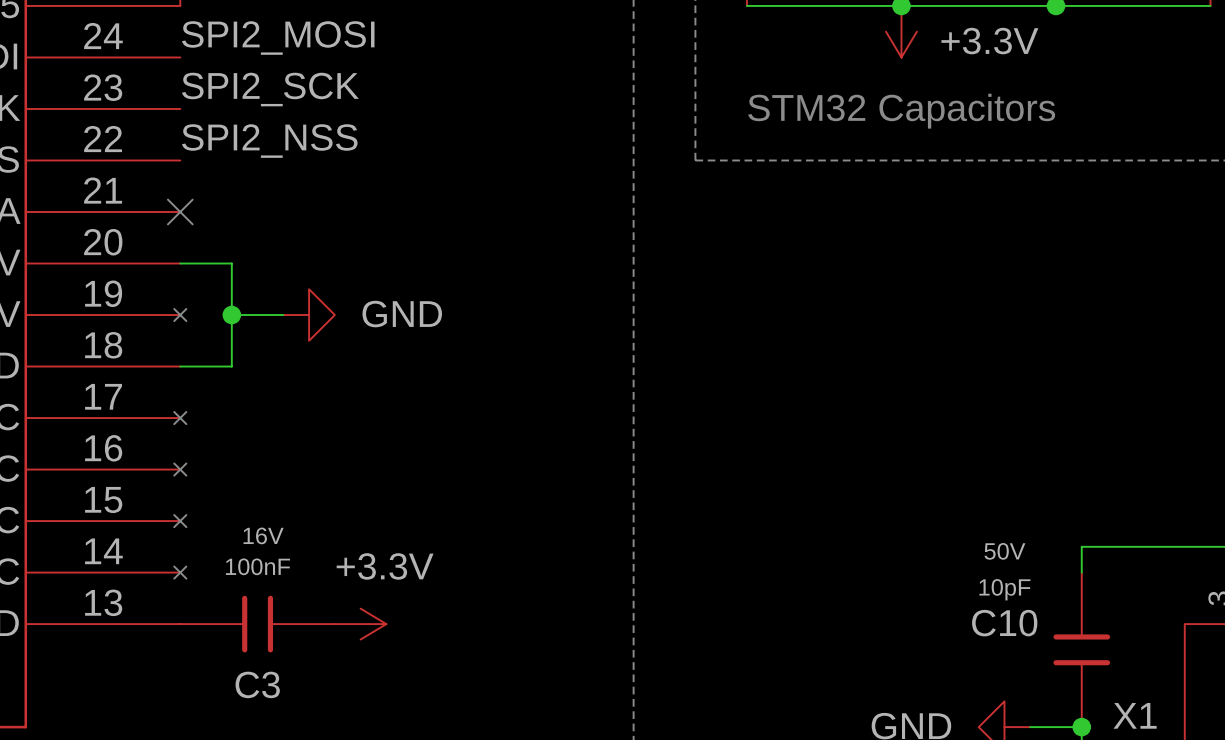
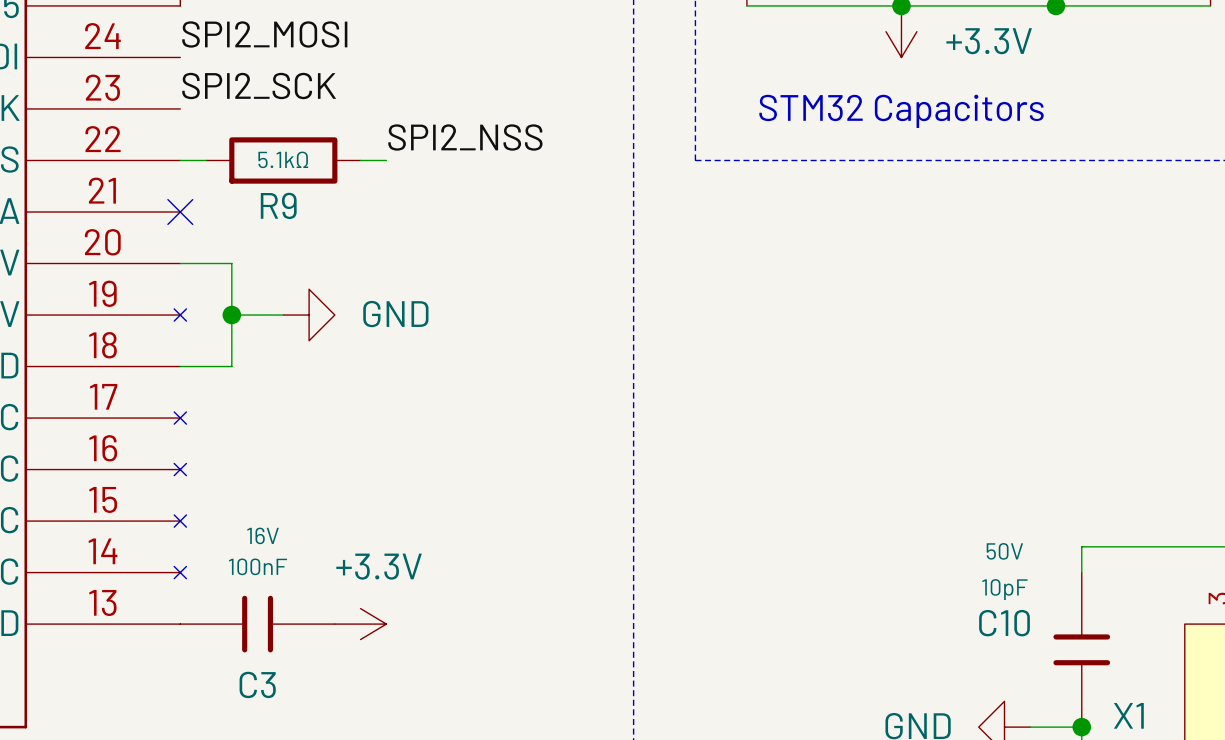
label position: SPI2_NSS (269, 141) -> SPI2_NSS (465, 137)
wire: none -> (180, 160) (206, 160)
R9: none -> 5.1kΩ (283, 160)
wire: none -> (360, 160) (386, 160)

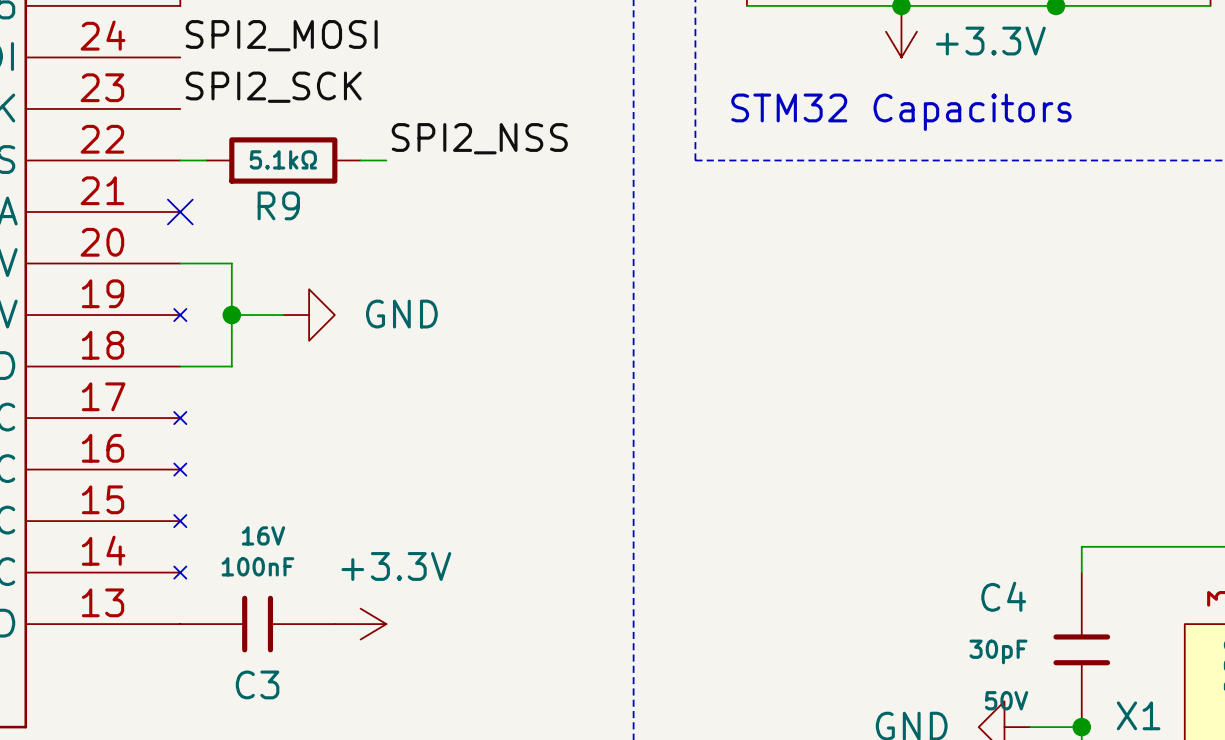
C10 text position: 50V (1004, 551) -> 50V (1006, 700)
C10 value: 10pF (1004, 589) -> 30pF (998, 651)
C10 name: C10 (1004, 623) -> C4 (1003, 596)

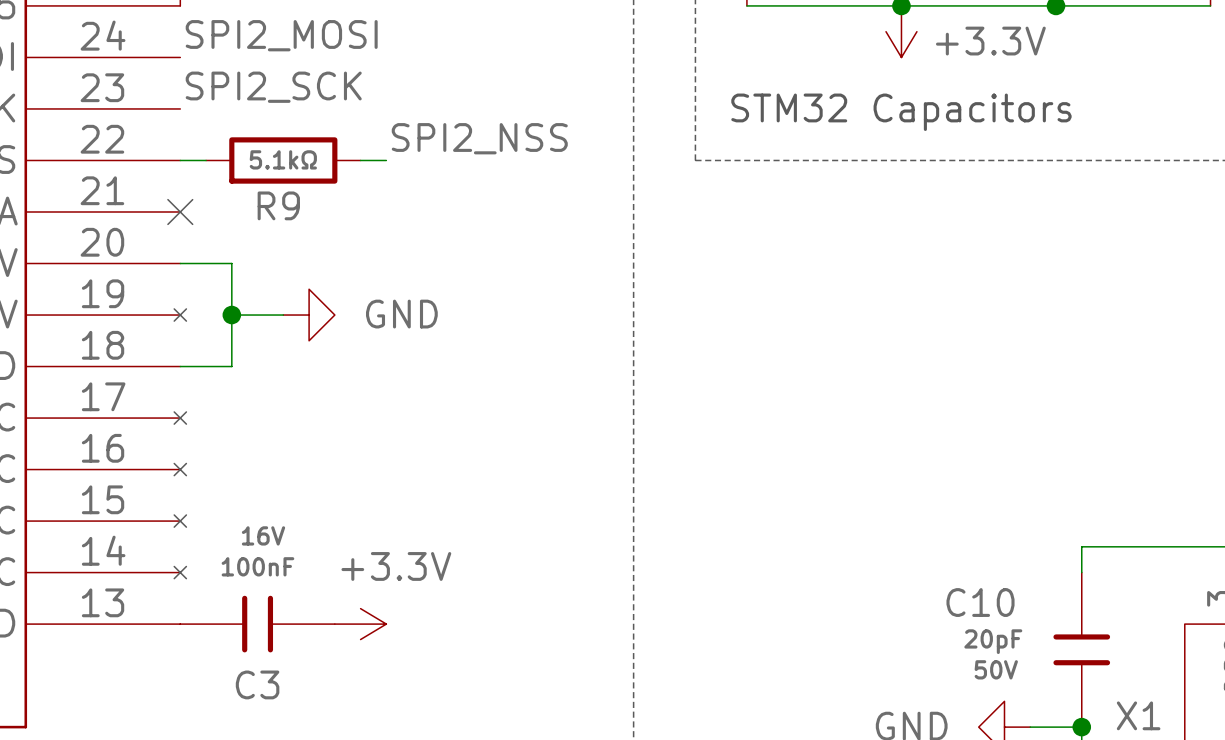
C4 name: C4 (1003, 596) -> C10 (980, 602)
C4 value: 30pF (998, 651) -> 20pF (993, 641)
C4 text position: 50V (1006, 700) -> 50V (996, 669)

